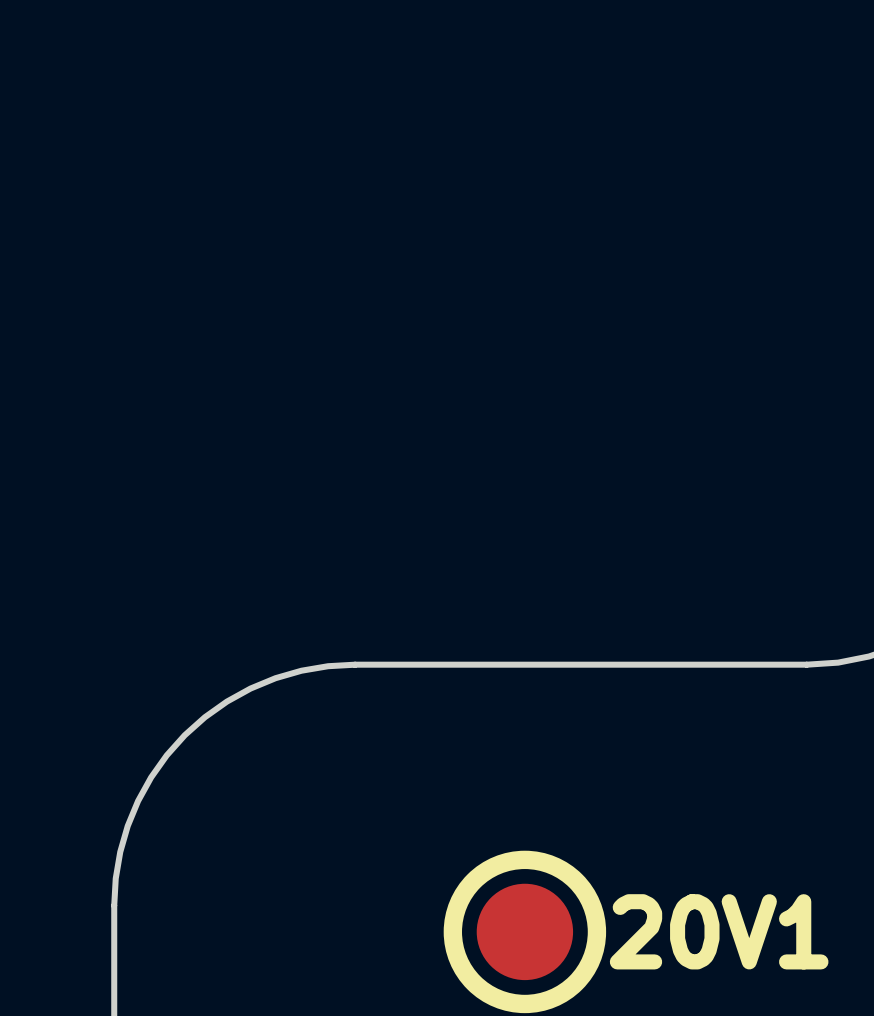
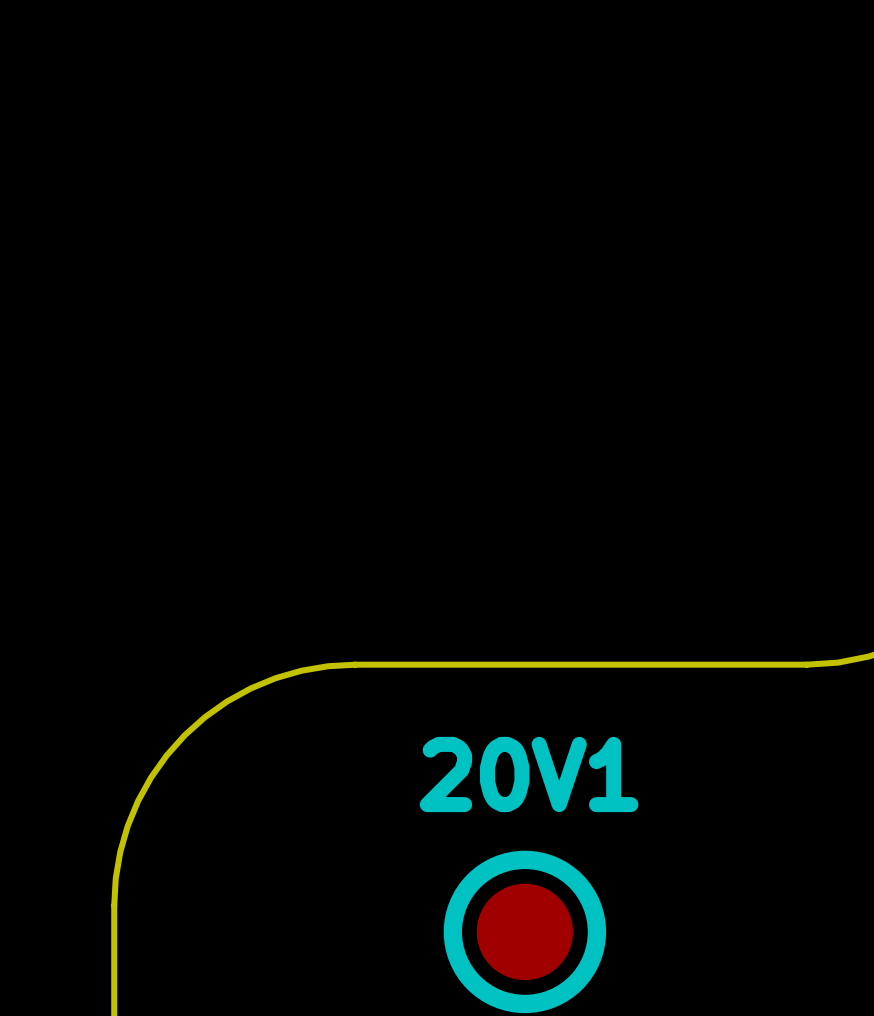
20V1 name position: 20V1 (719, 931) -> 20V1 (529, 774)

